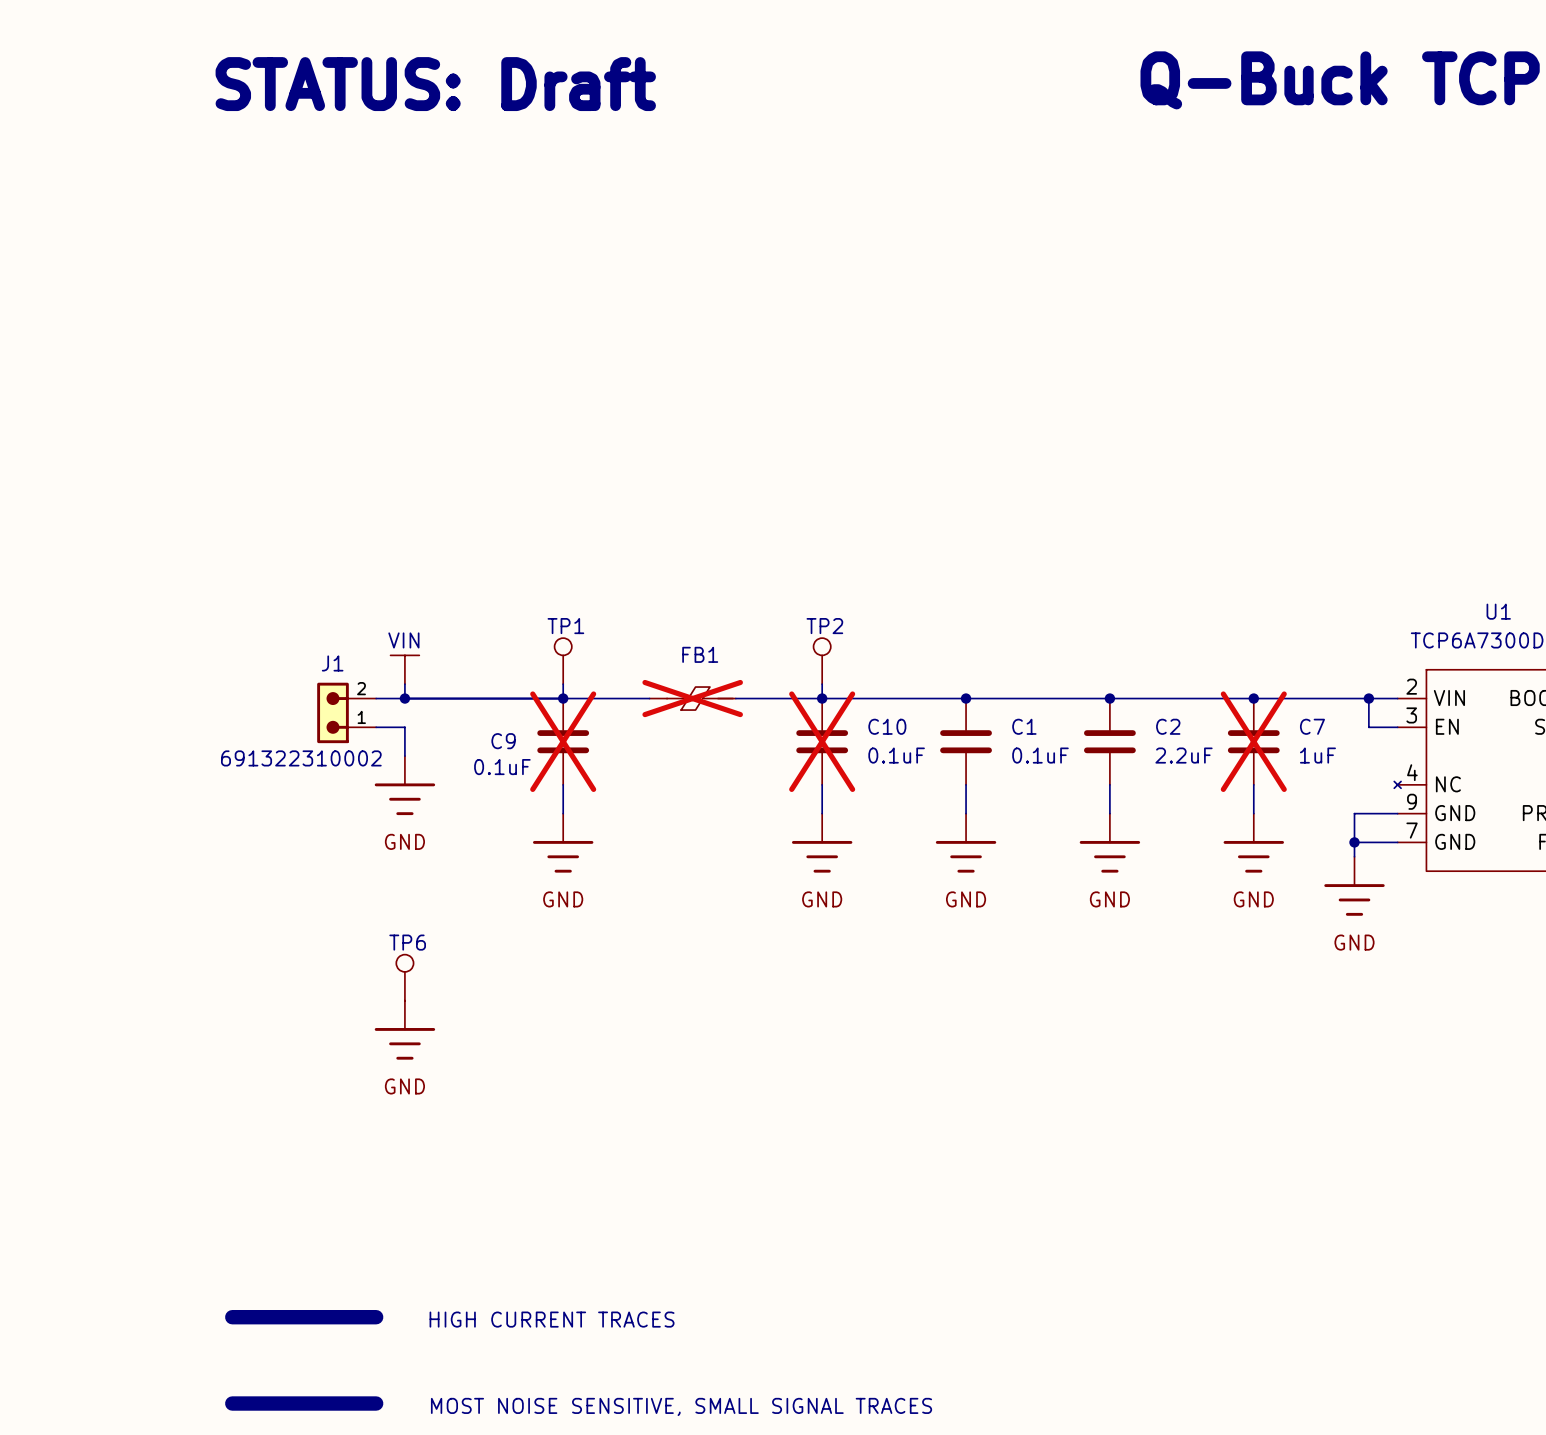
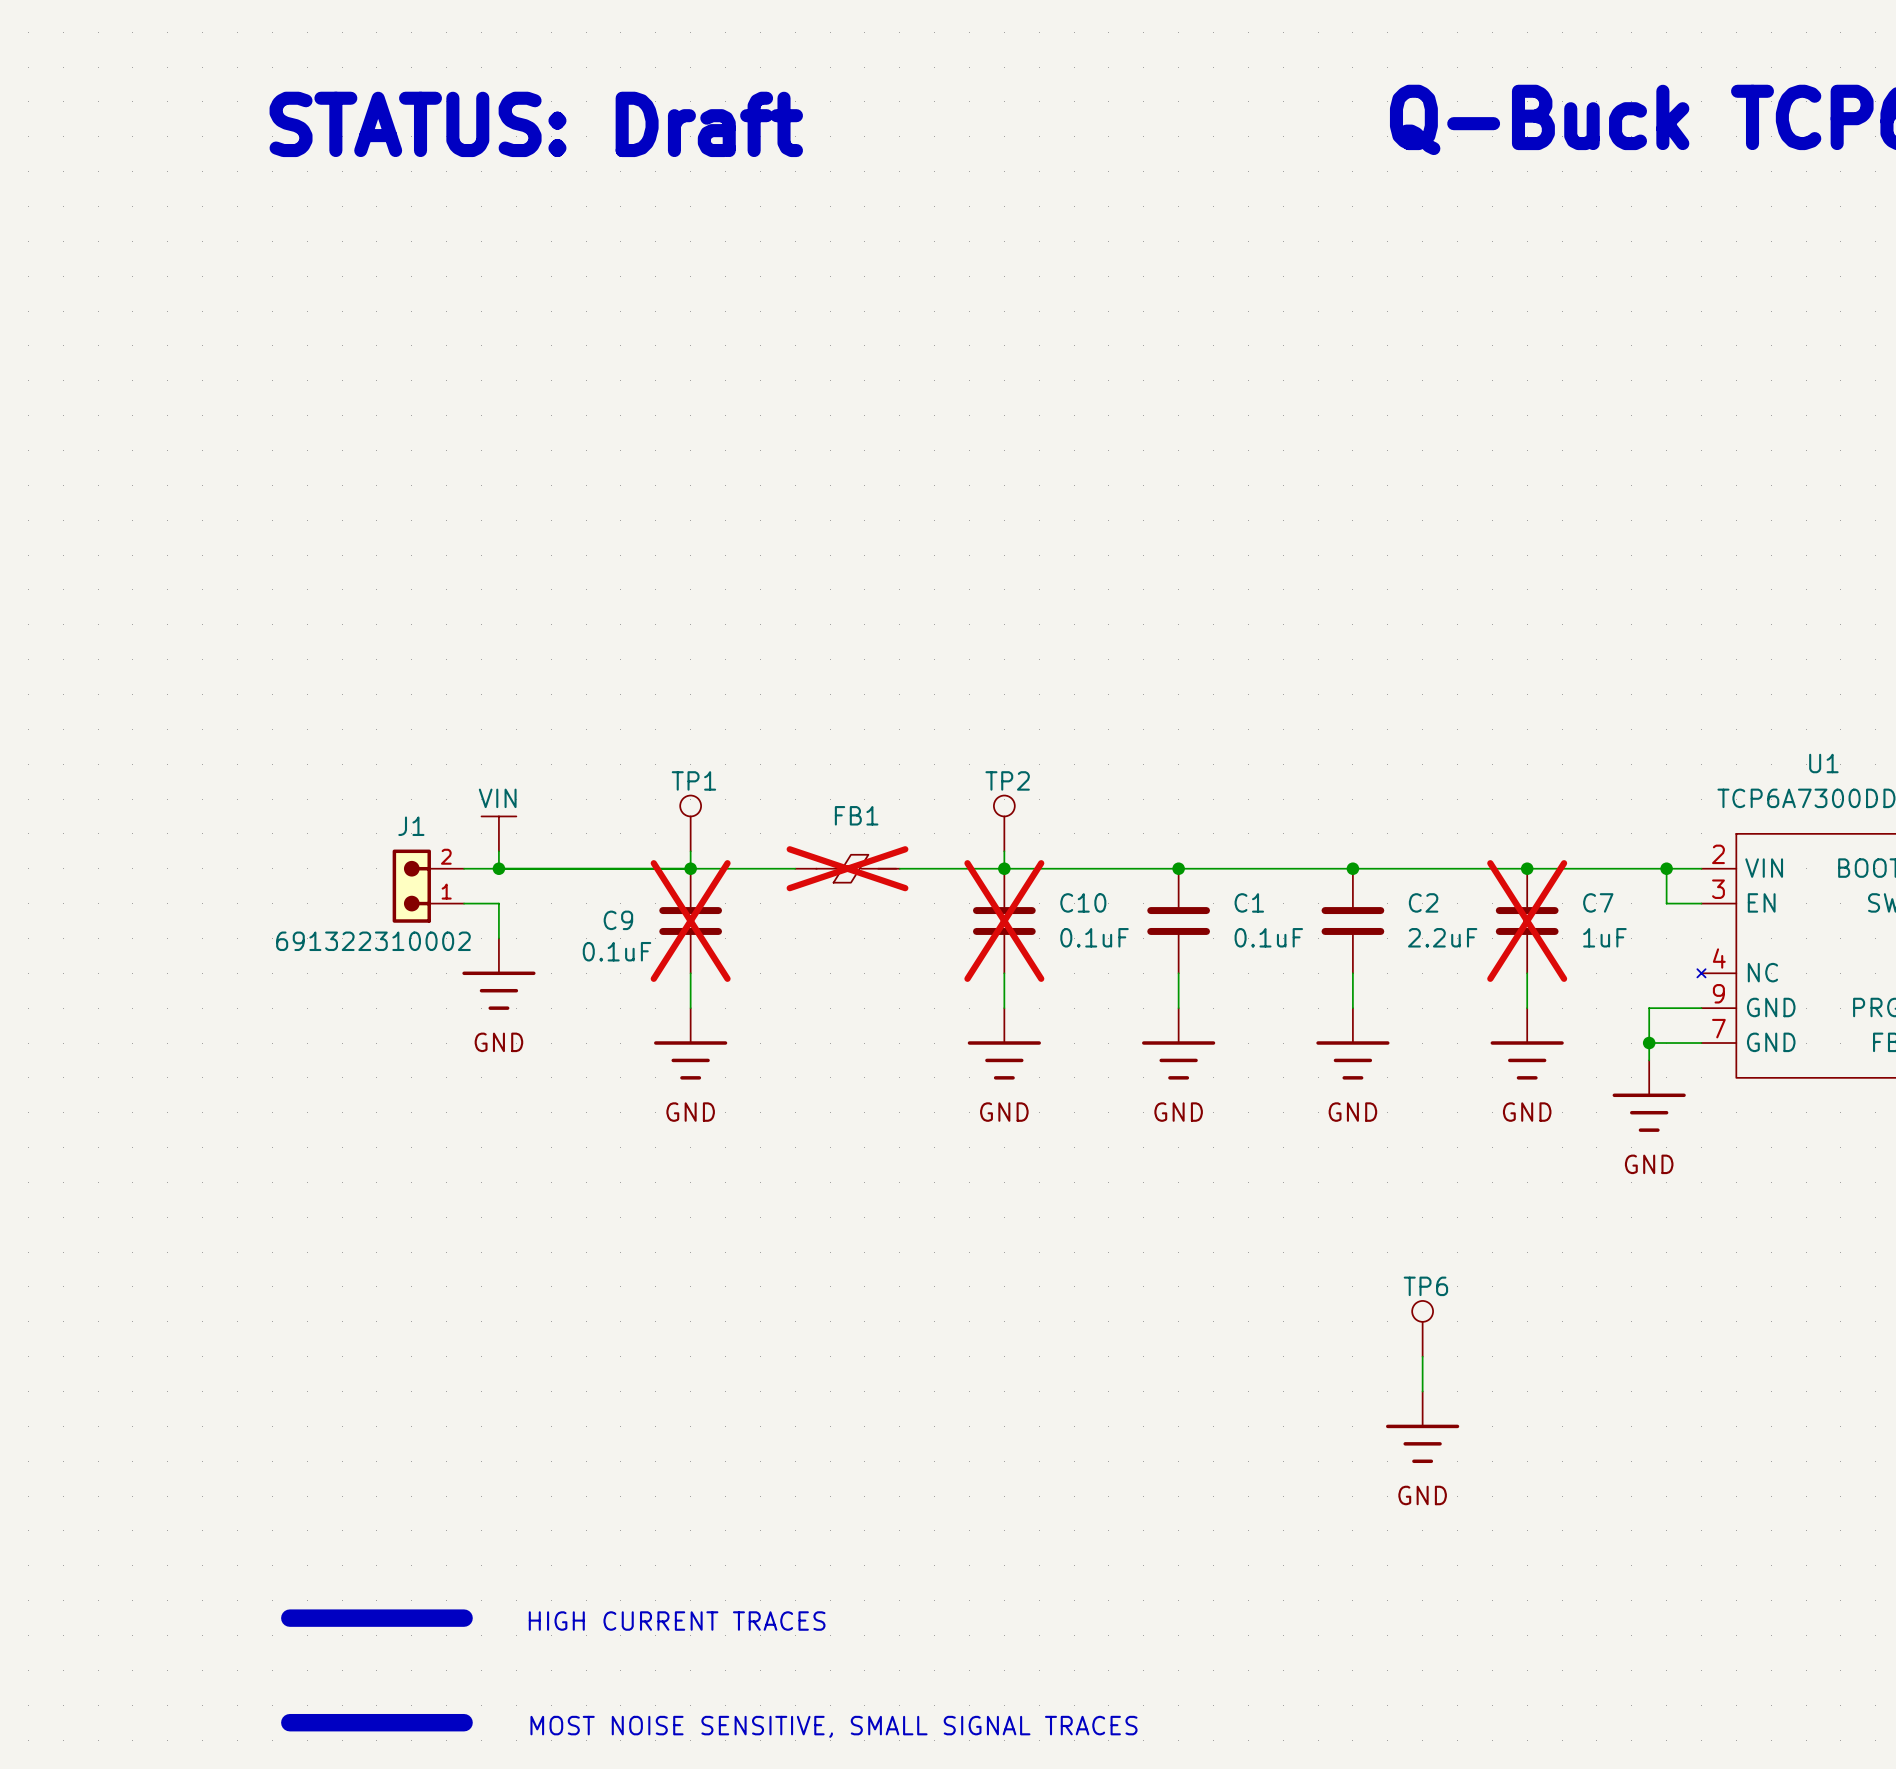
TP6 position: (404, 977) -> (1422, 1328)
power symbol: (404, 1030) -> none
wire: none -> (1422, 1356) (1422, 1391)
power symbol: none -> (1422, 1427)

